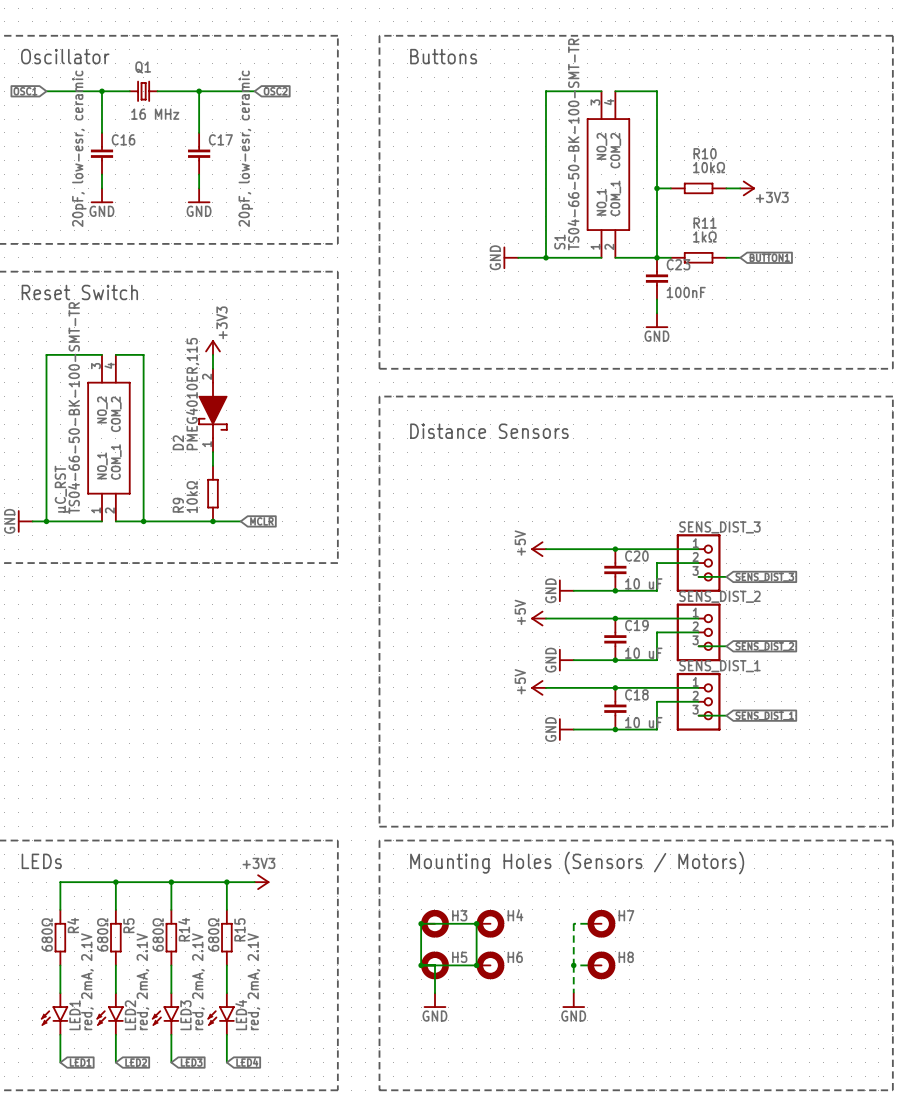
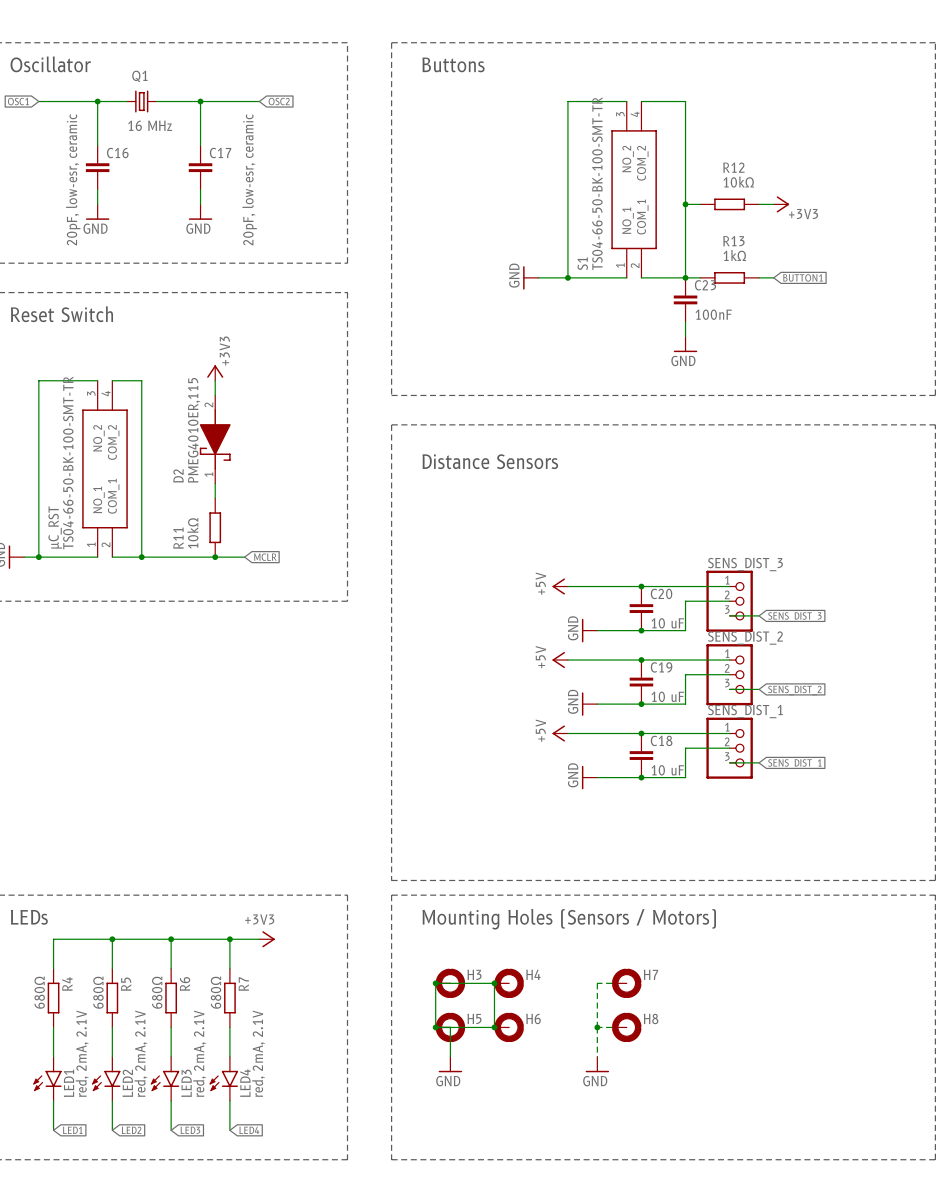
R10 name: R10 (705, 153) -> R12 (733, 167)
R11 name: R11 (705, 223) -> R13 (733, 241)
R9 name: R9 (178, 505) -> R11 (178, 538)
R14 name: R14 (184, 929) -> R6 (185, 983)
R15 name: R15 (239, 929) -> R7 (243, 984)

